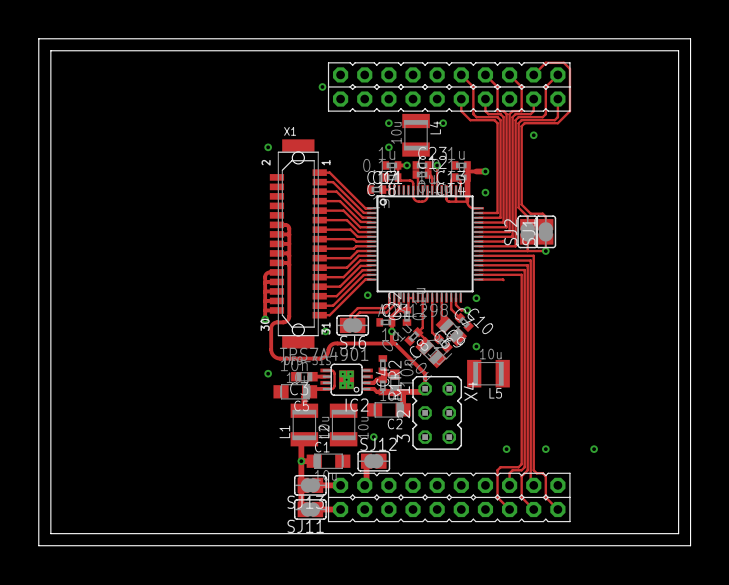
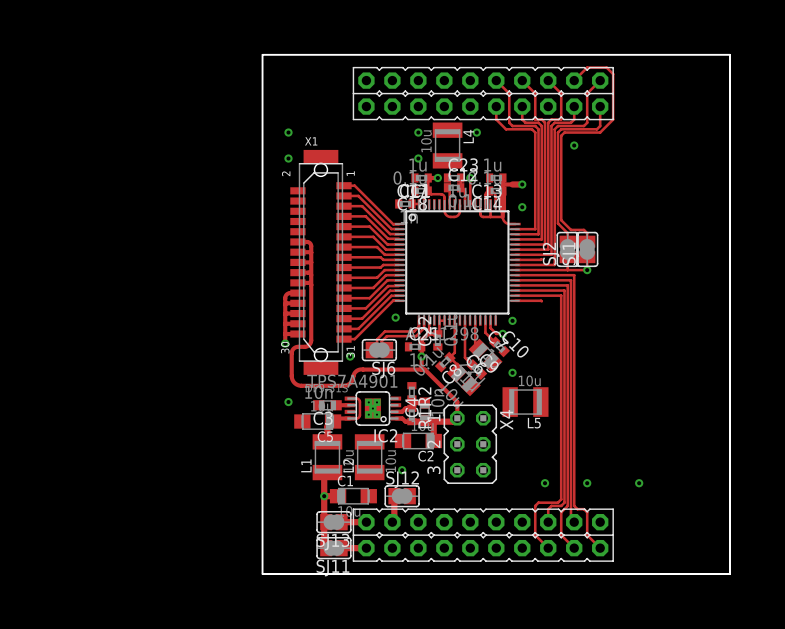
board edge: (38, 38) (690, 38) (690, 545) (38, 545) (38, 38) -> (262, 54) (262, 574) (729, 574) (729, 54) (262, 54)
via: (322, 86) -> none
via: none -> (288, 132)
part: (364, 292) -> none
part: none -> (496, 314)

